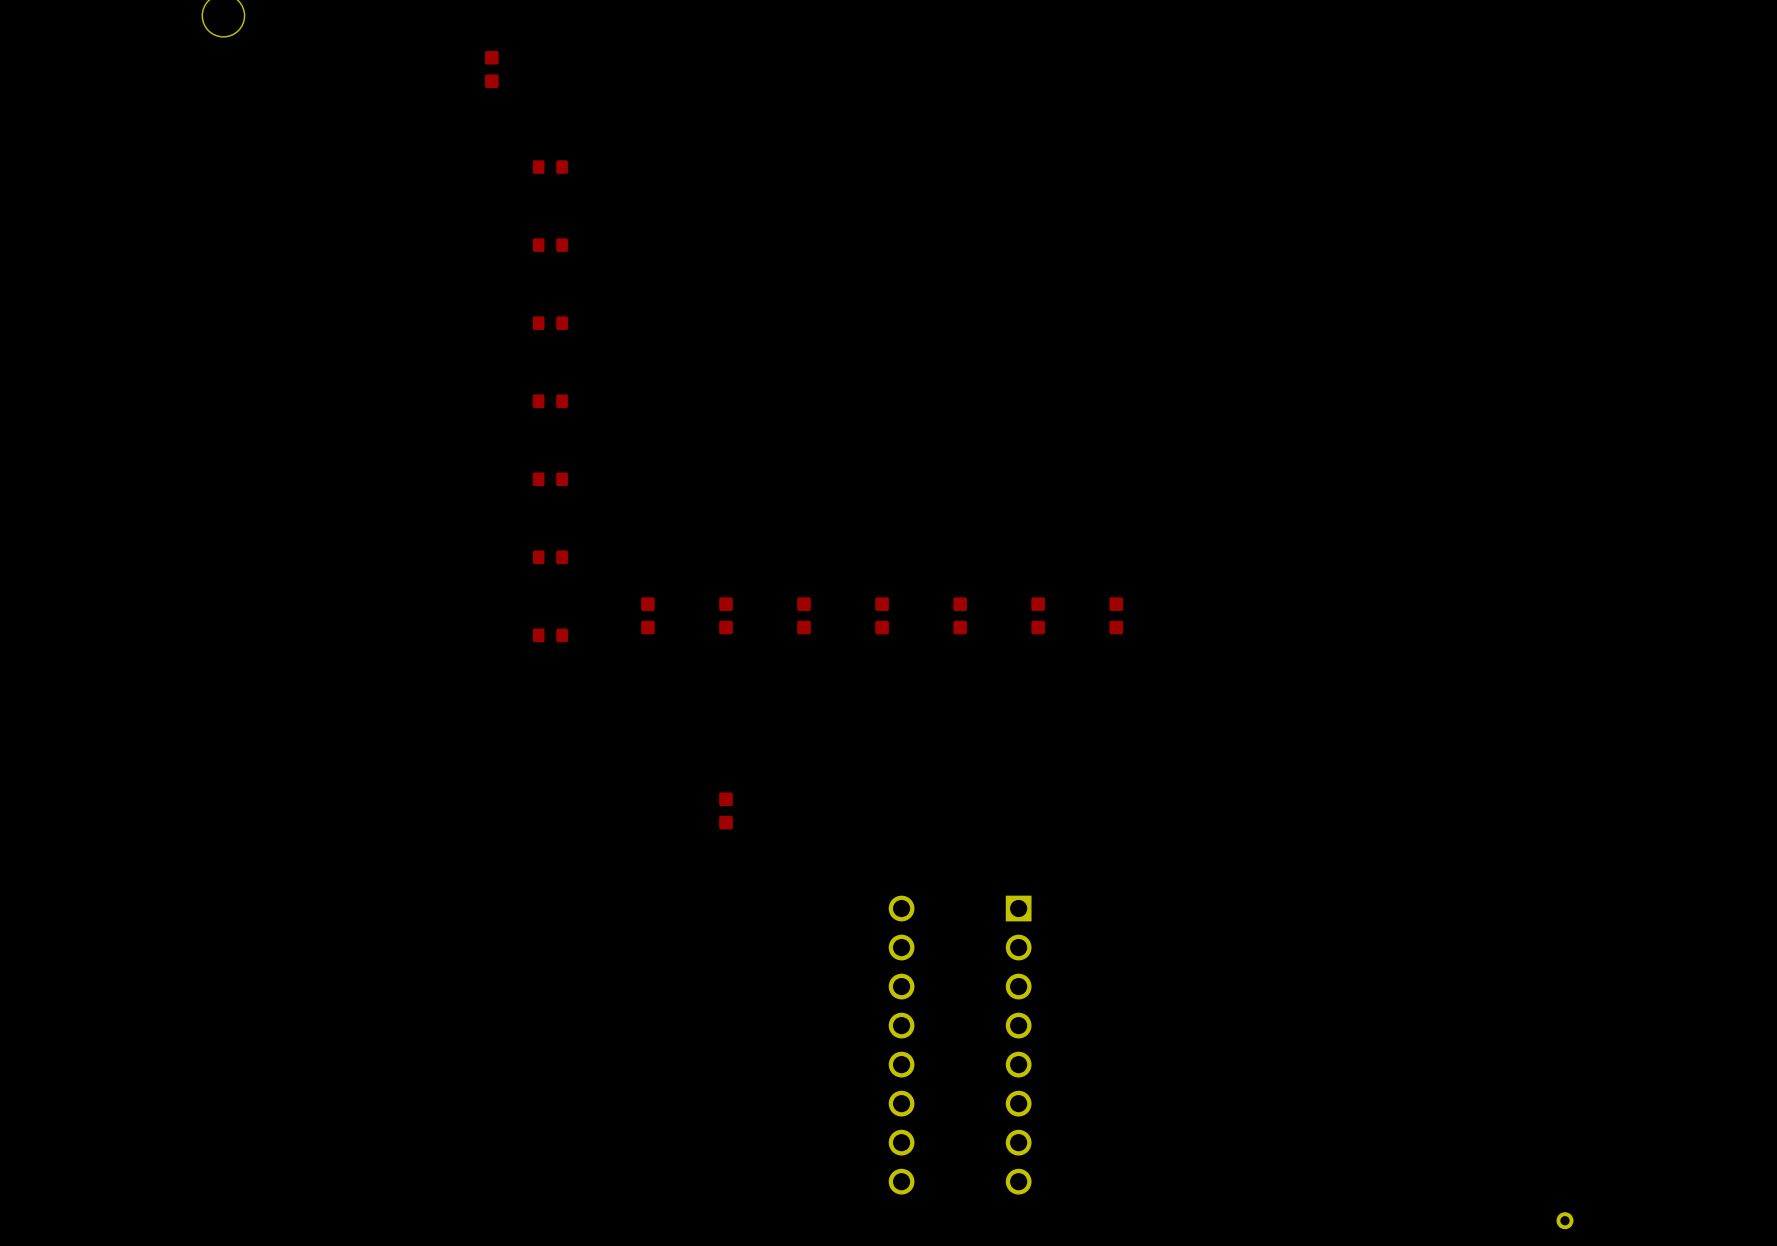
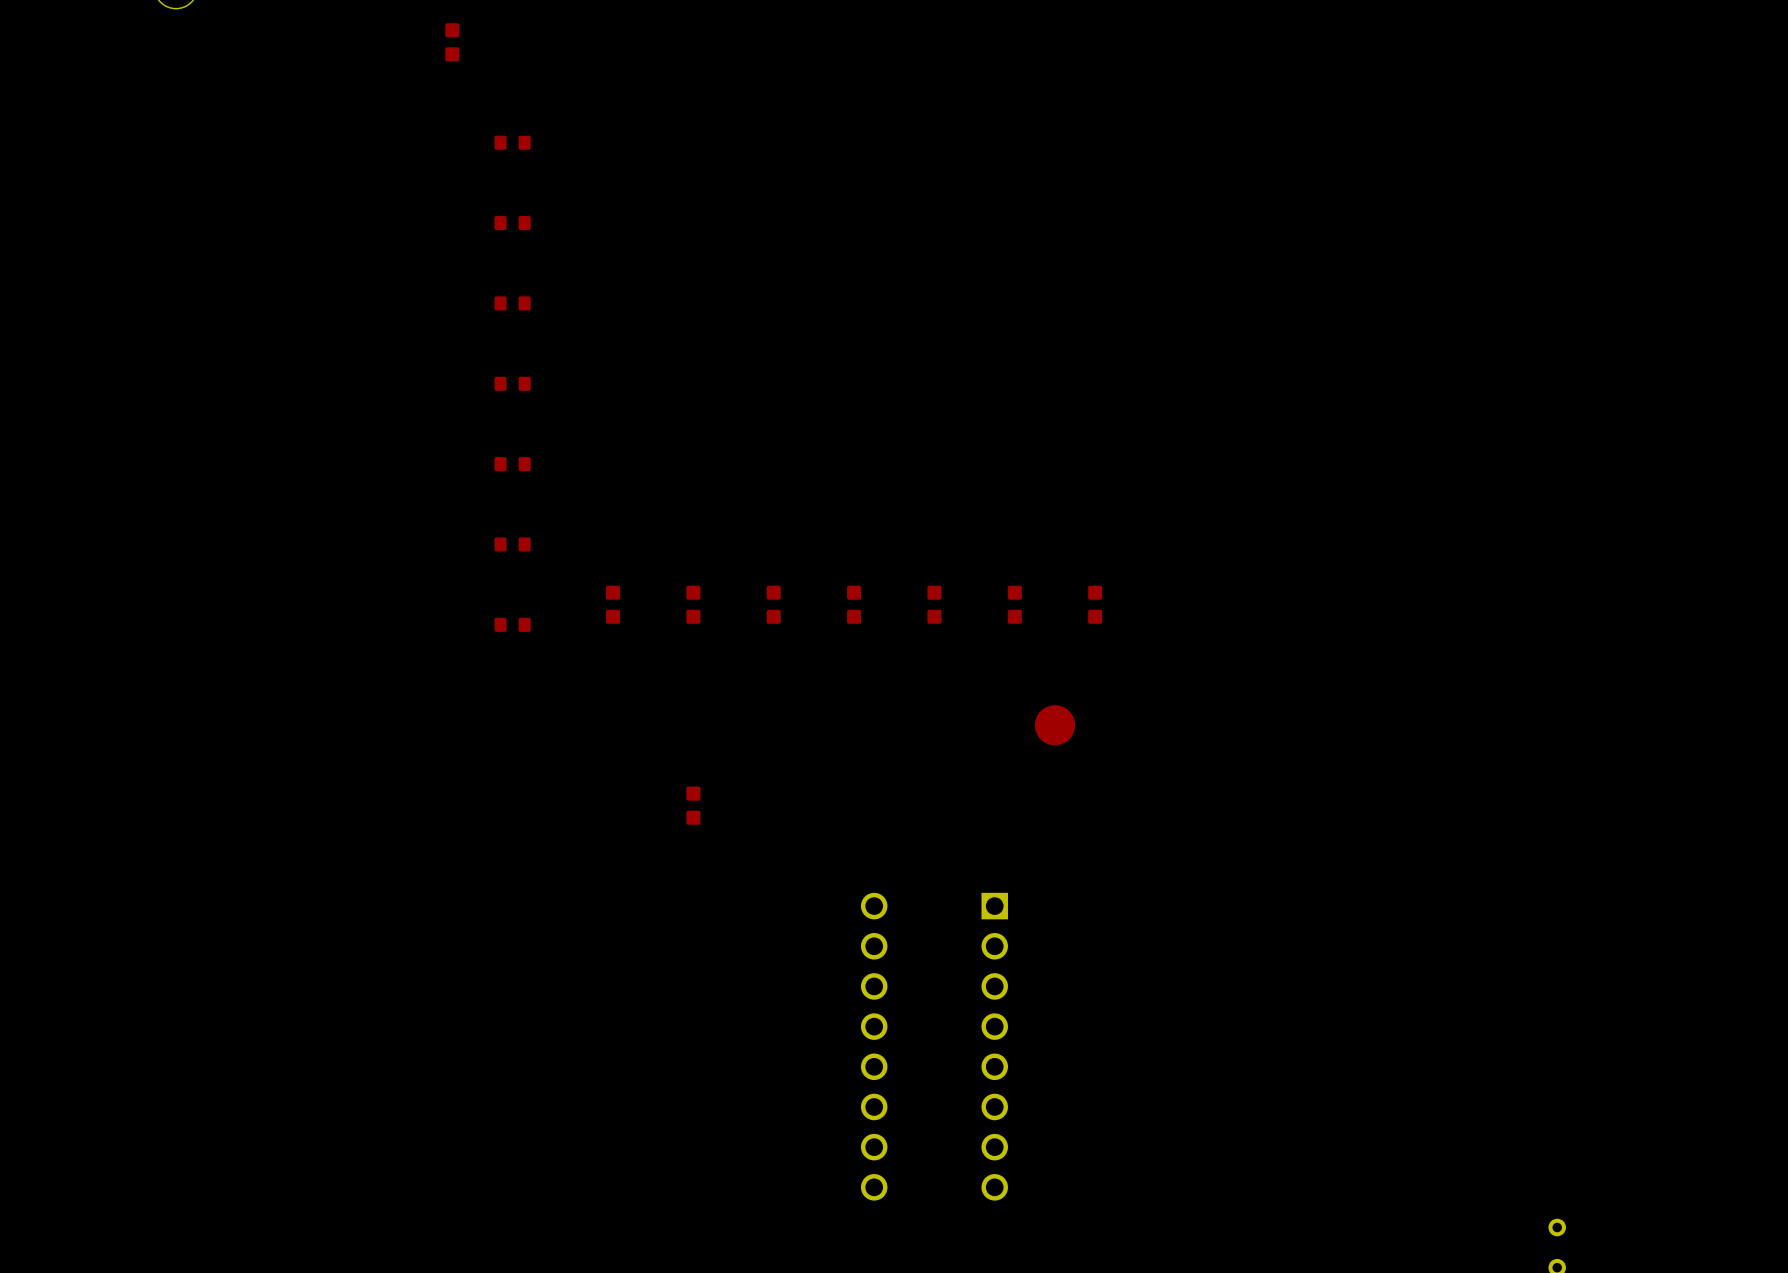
part: none -> (1055, 725)

